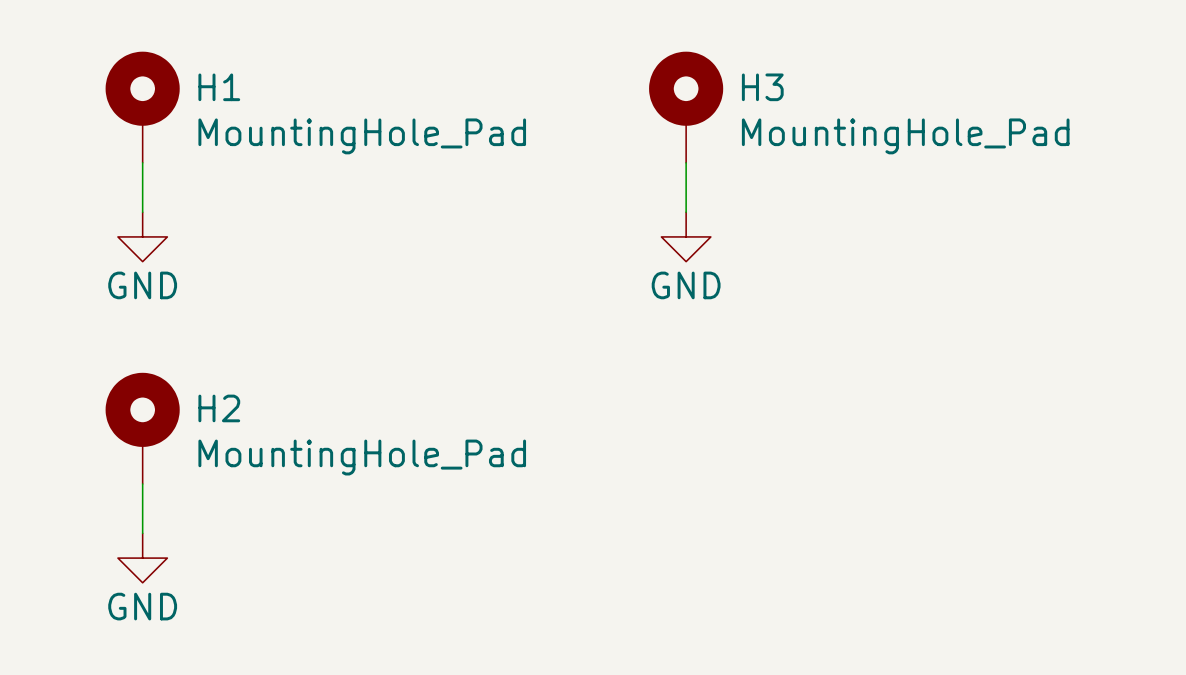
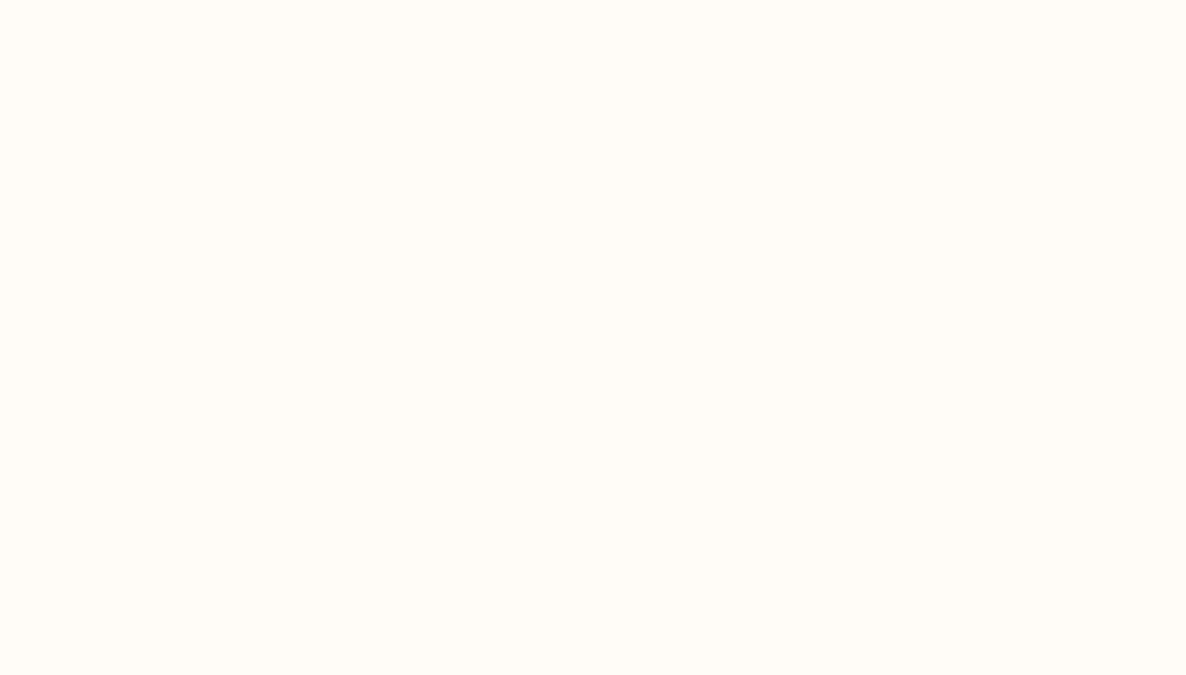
H1: MountingHole_Pad (142, 107) -> none
H3: MountingHole_Pad (686, 107) -> none
wire: (142, 162) (142, 212) -> none
wire: (686, 162) (686, 212) -> none
power symbol: GND (142, 236) -> none
power symbol: GND (686, 236) -> none
H2: MountingHole_Pad (142, 428) -> none
wire: (142, 483) (142, 533) -> none
power symbol: GND (142, 558) -> none

